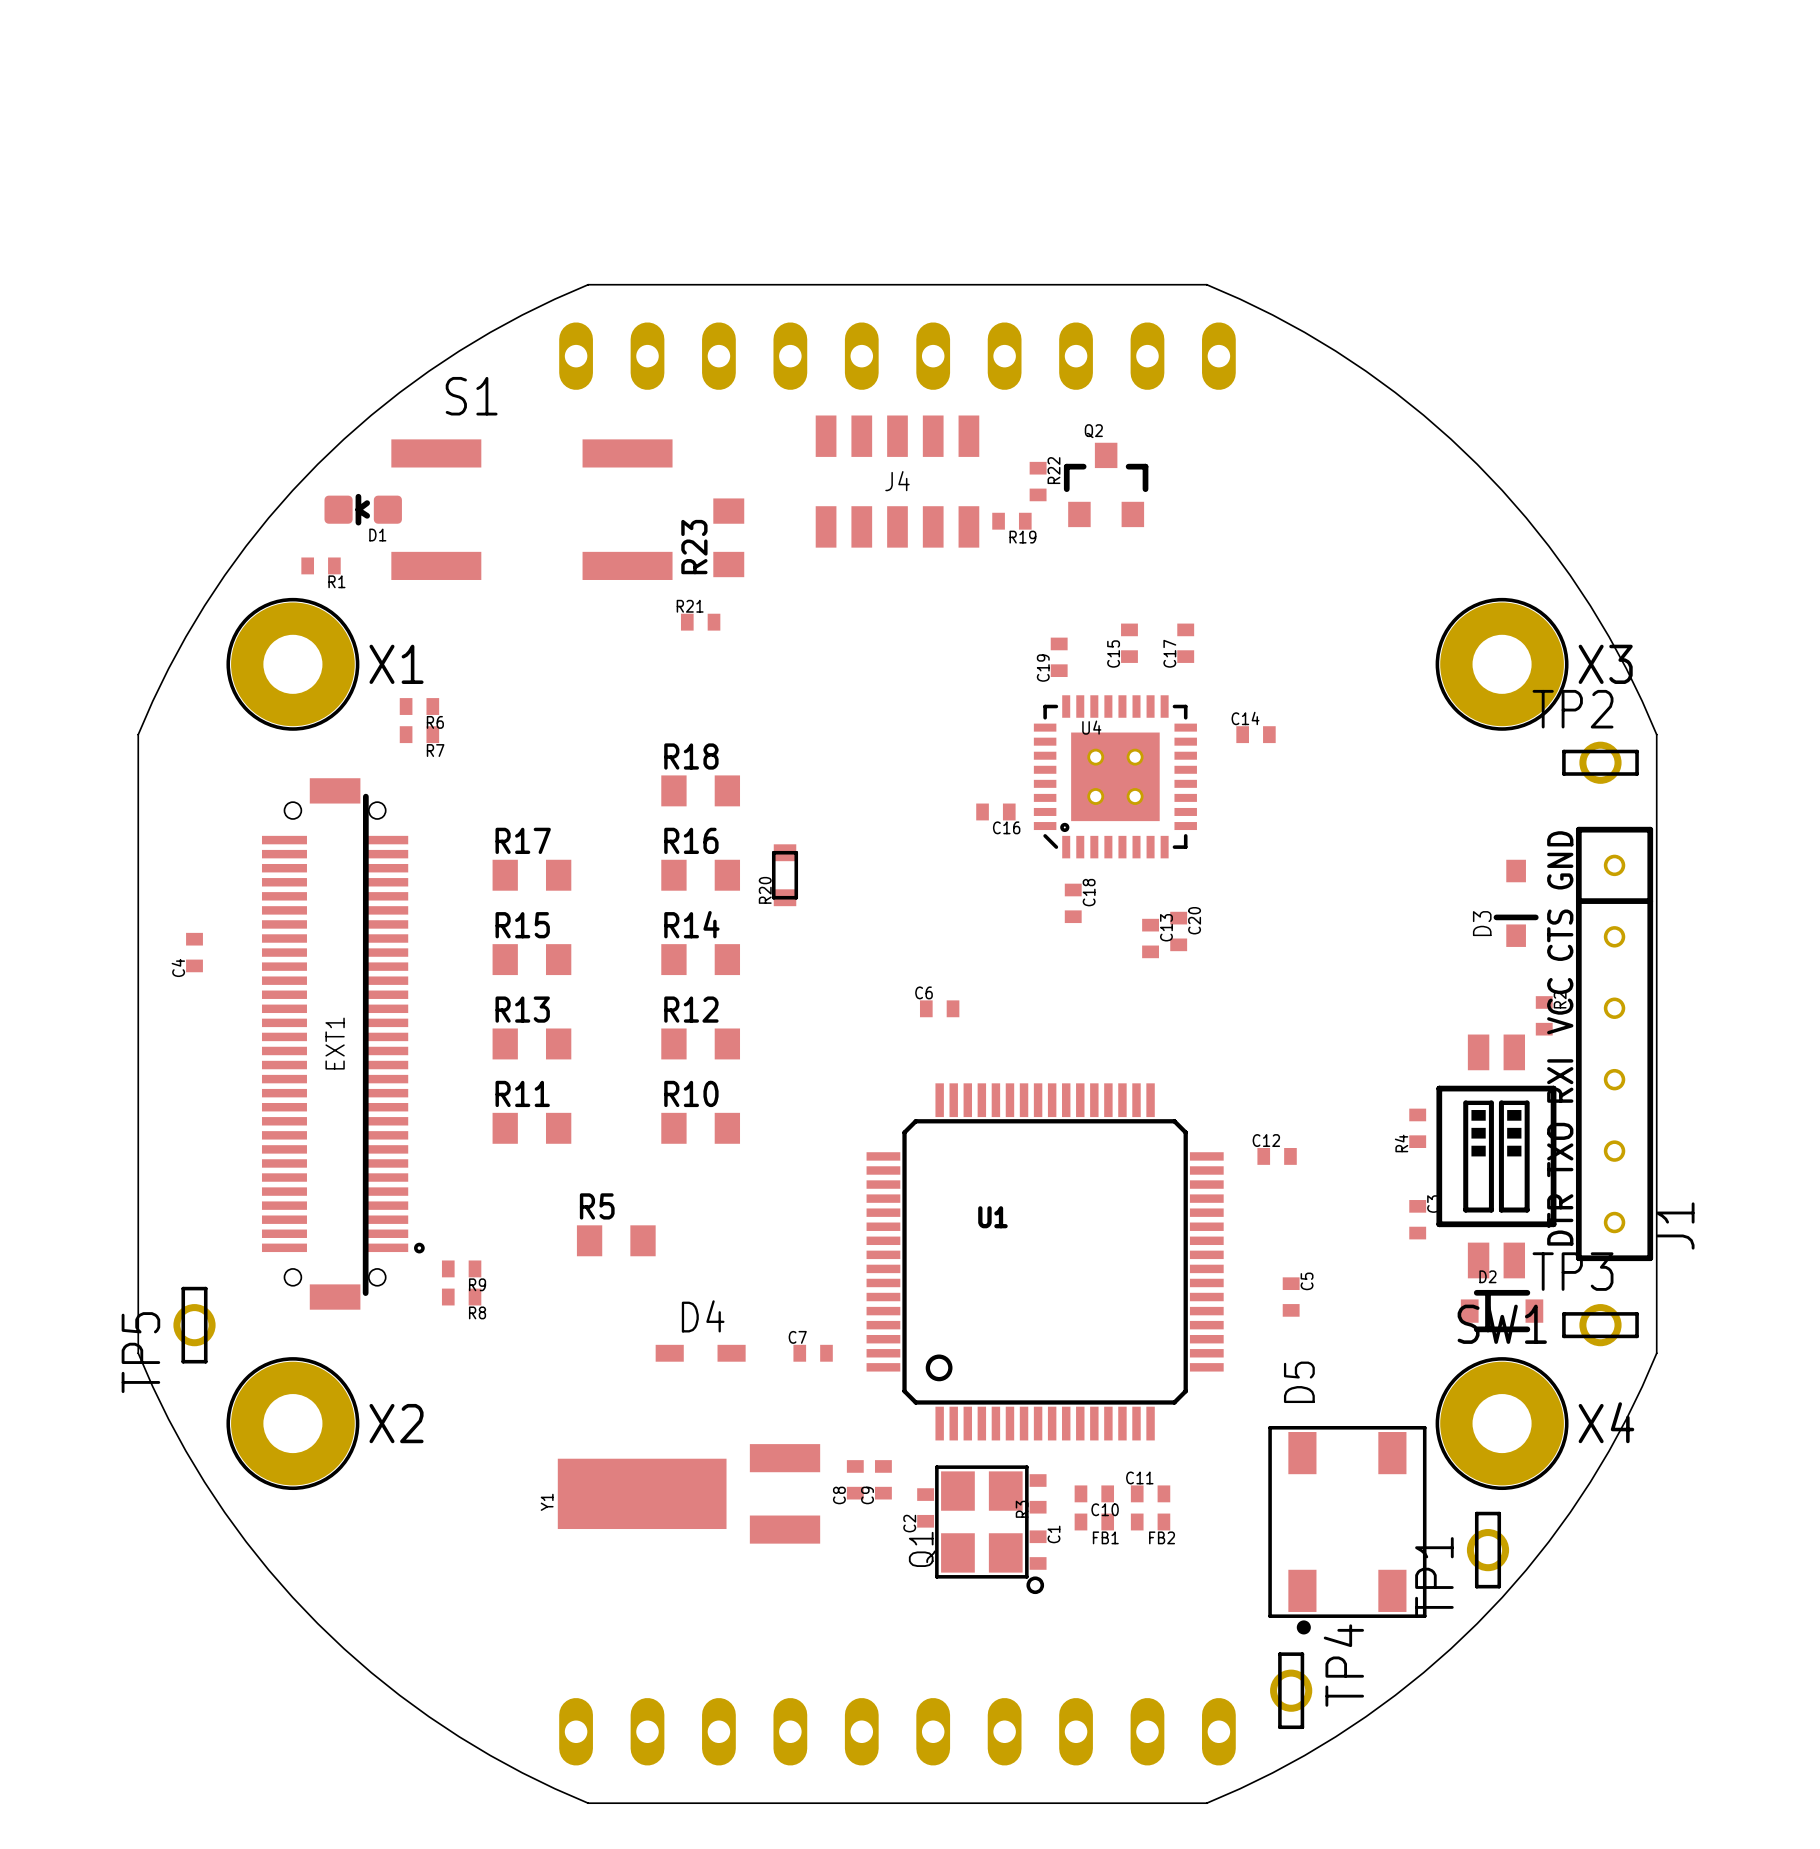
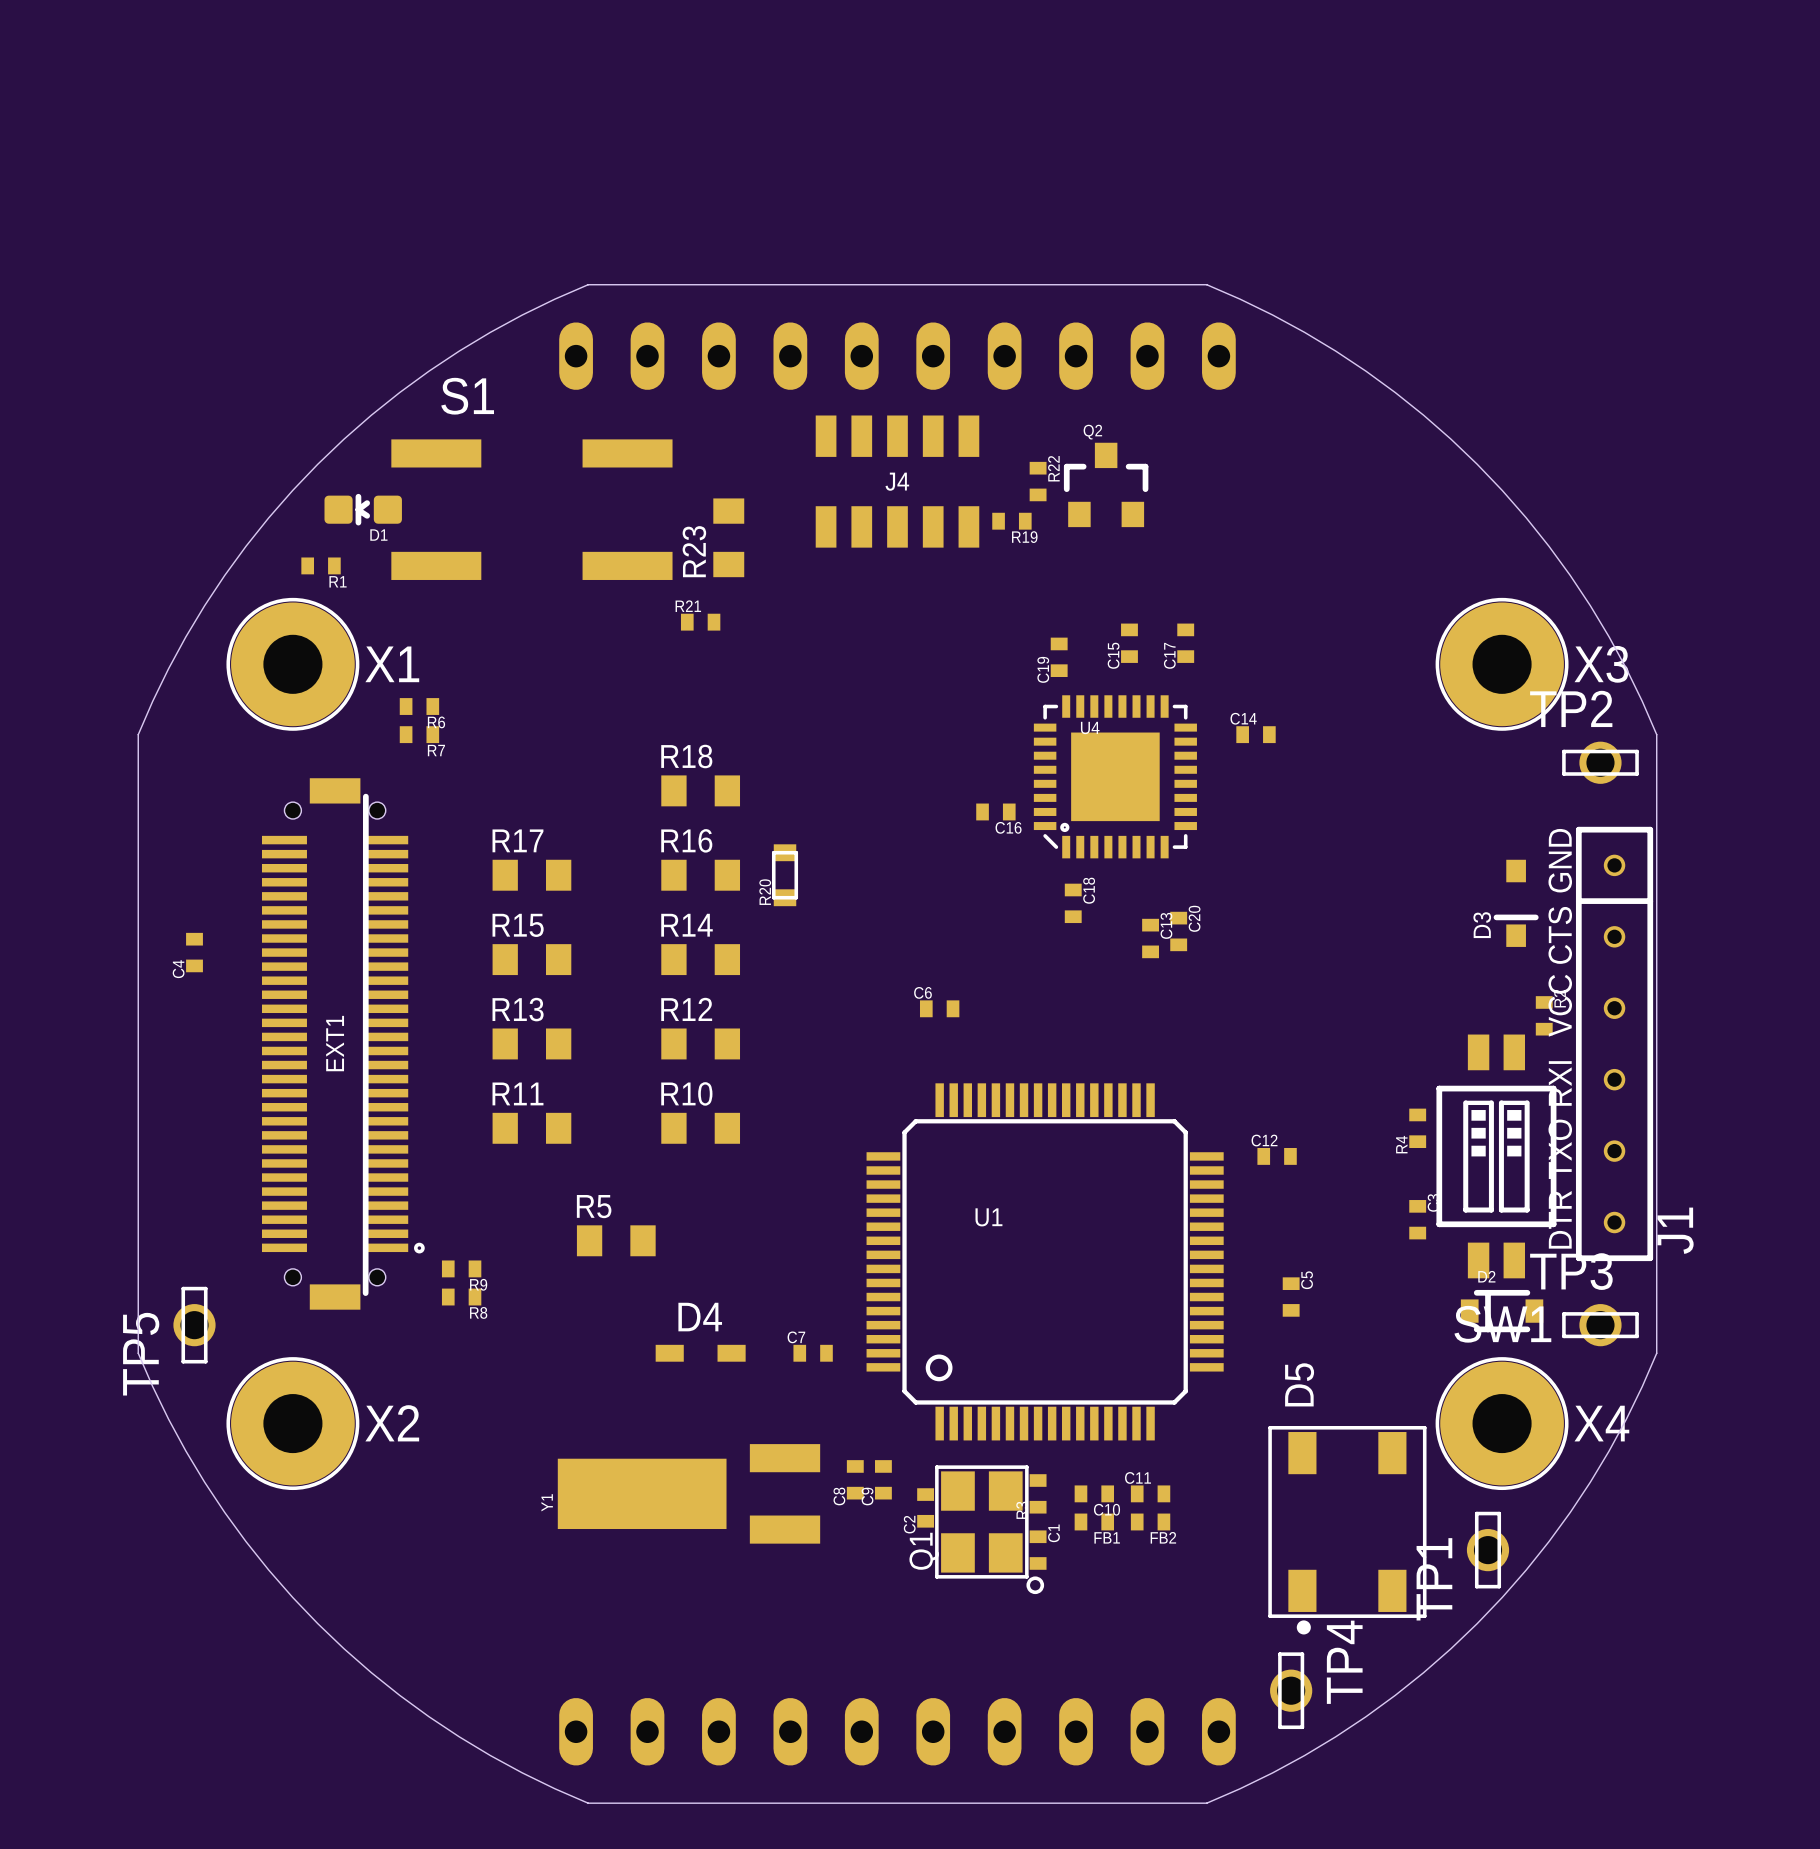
U4 footprint: [1033, 695, 1197, 859] -> [1033, 695, 1197, 859]

